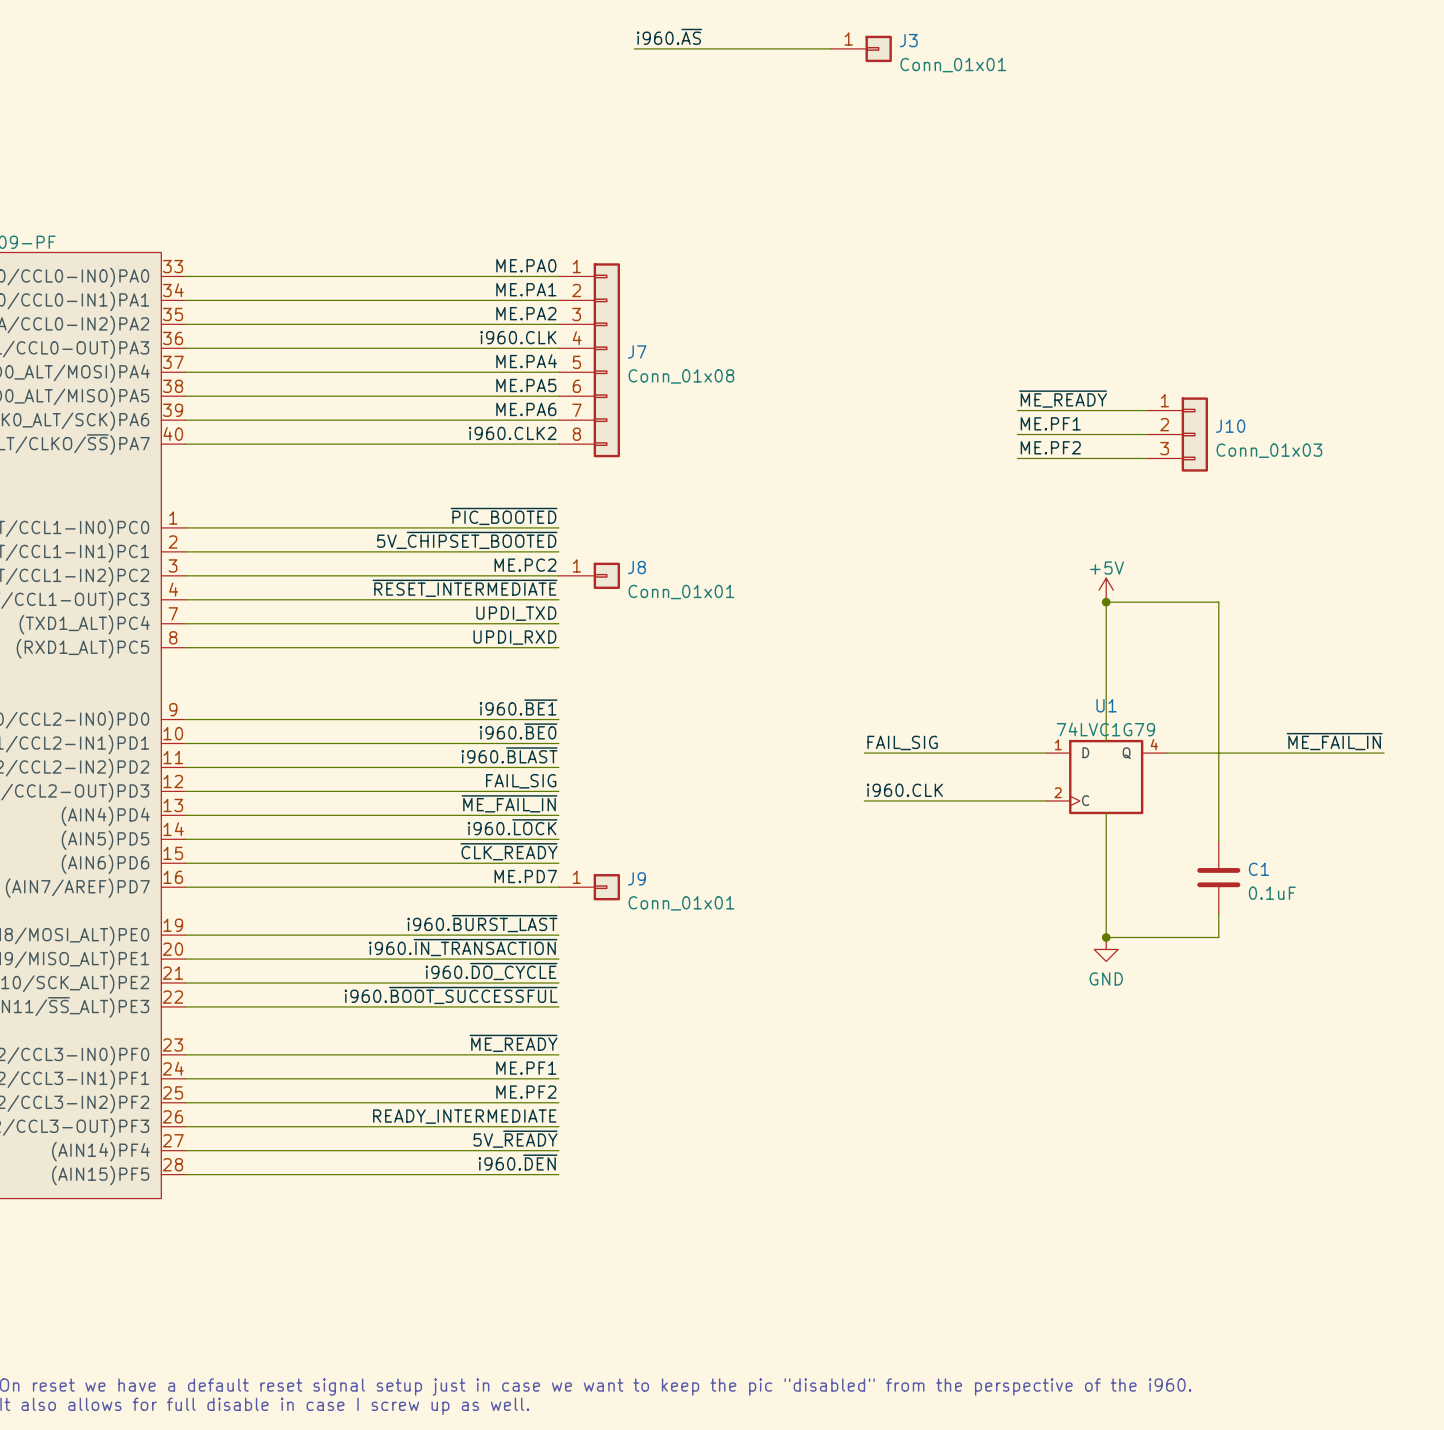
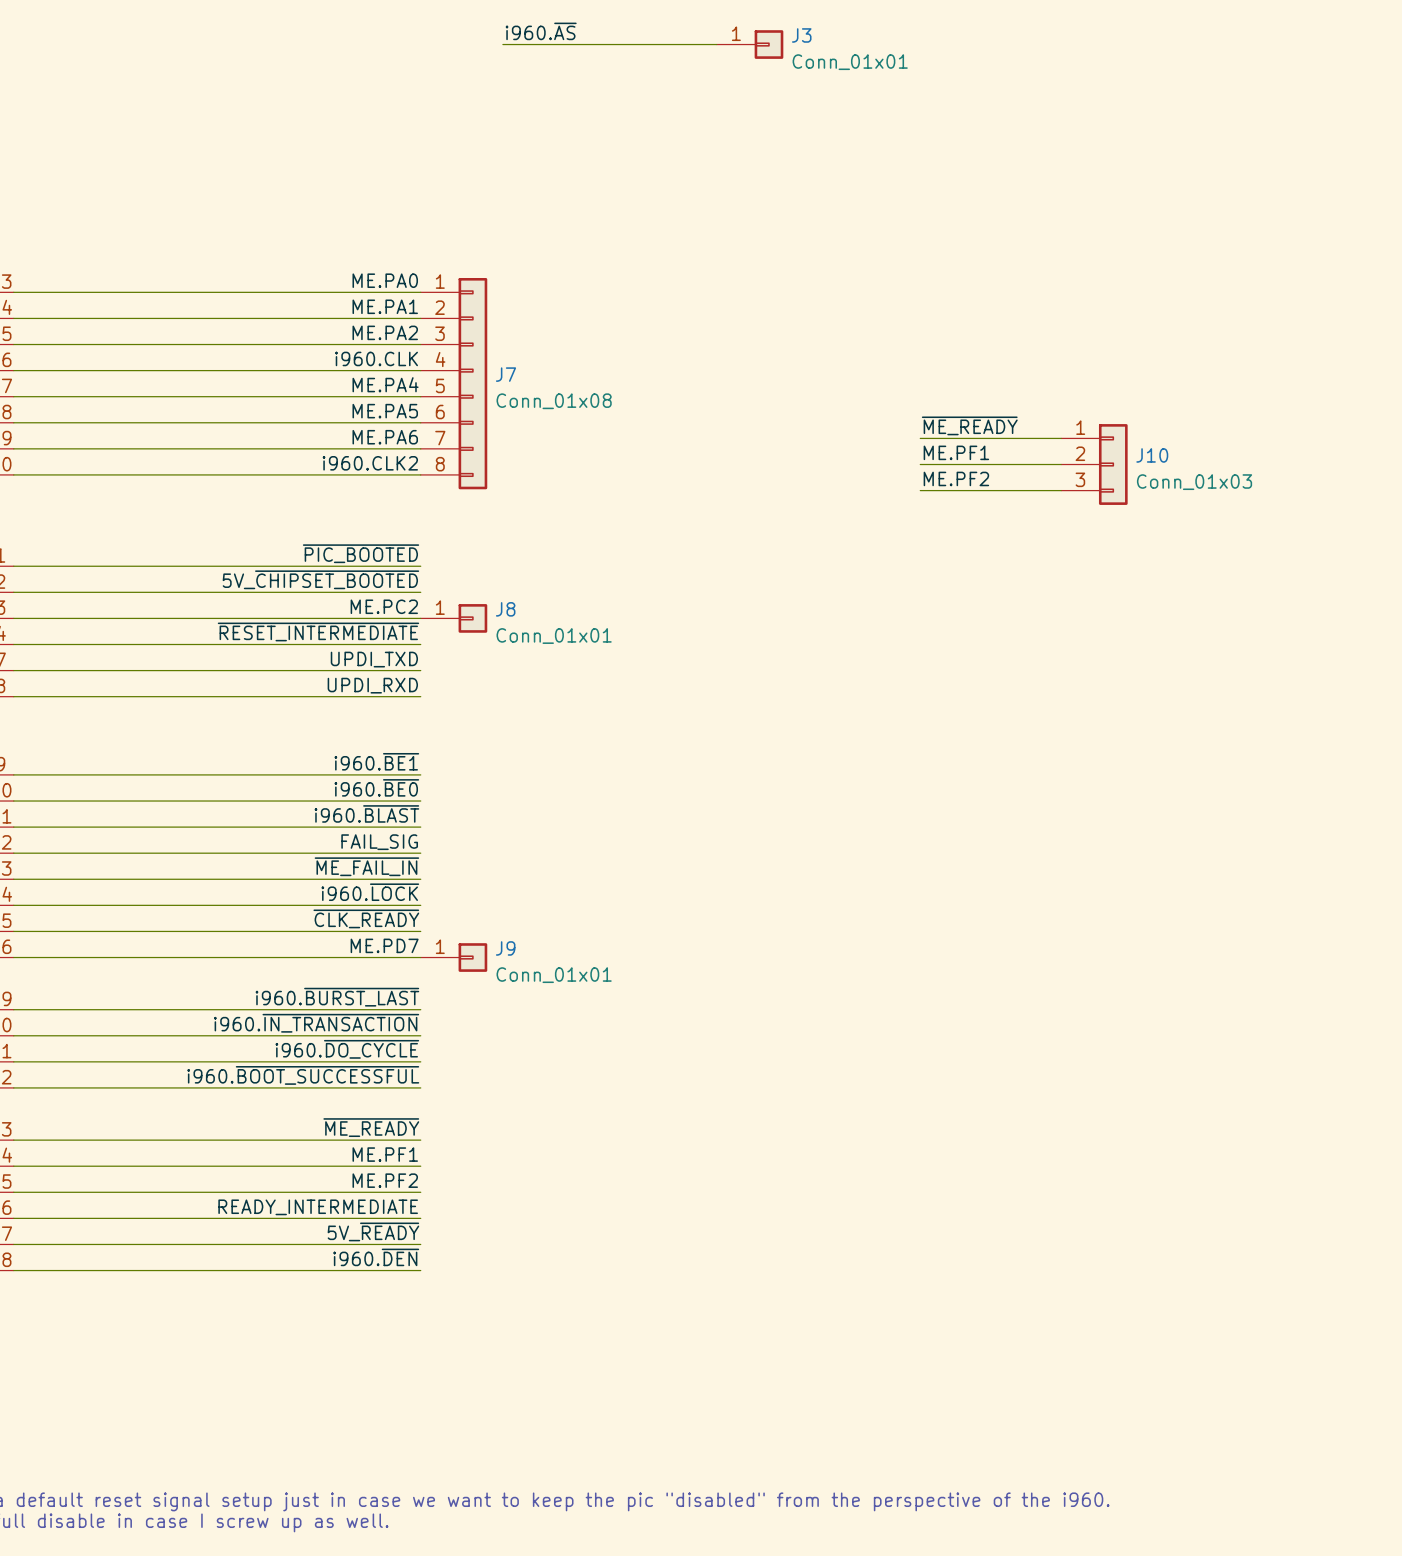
power symbol: +5V (1106, 590) -> none
junction: (1106, 602) -> none
wire: (1106, 741) (1106, 602) (1218, 602) (1218, 841) -> none
label: ~{ME_FAIL_IN} (1334, 741) -> none
label: FAIL_SIG (902, 742) -> none
wire: (864, 753) (1046, 753) -> none
wire: (1166, 753) (1384, 753) -> none
U1: 74LVC1G79 (1106, 777) -> none
label: i960.CLK (904, 790) -> none
wire: (864, 800) (1046, 800) -> none
wire: (1106, 812) (1106, 937) (1218, 937) (1218, 913) -> none
C1: 0.1uF (1218, 877) -> none
junction: (1106, 937) -> none
power symbol: GND (1106, 949) -> none

